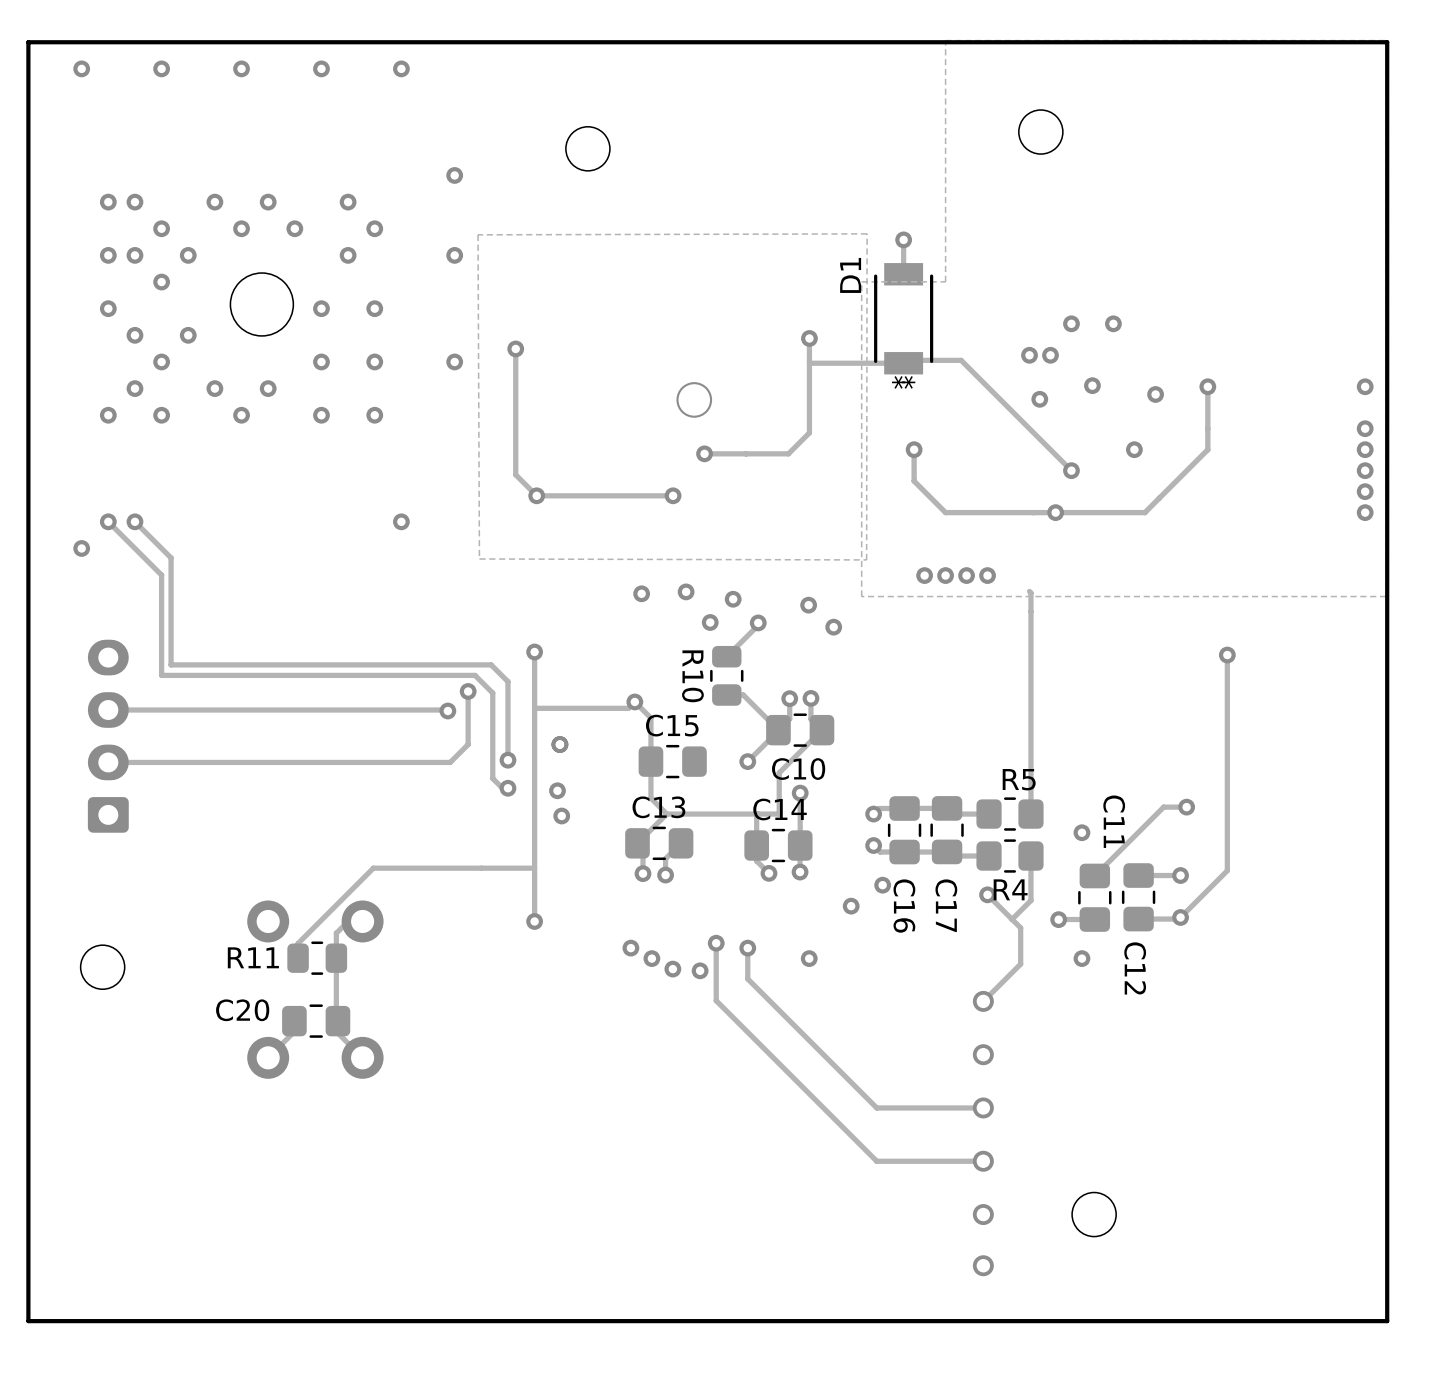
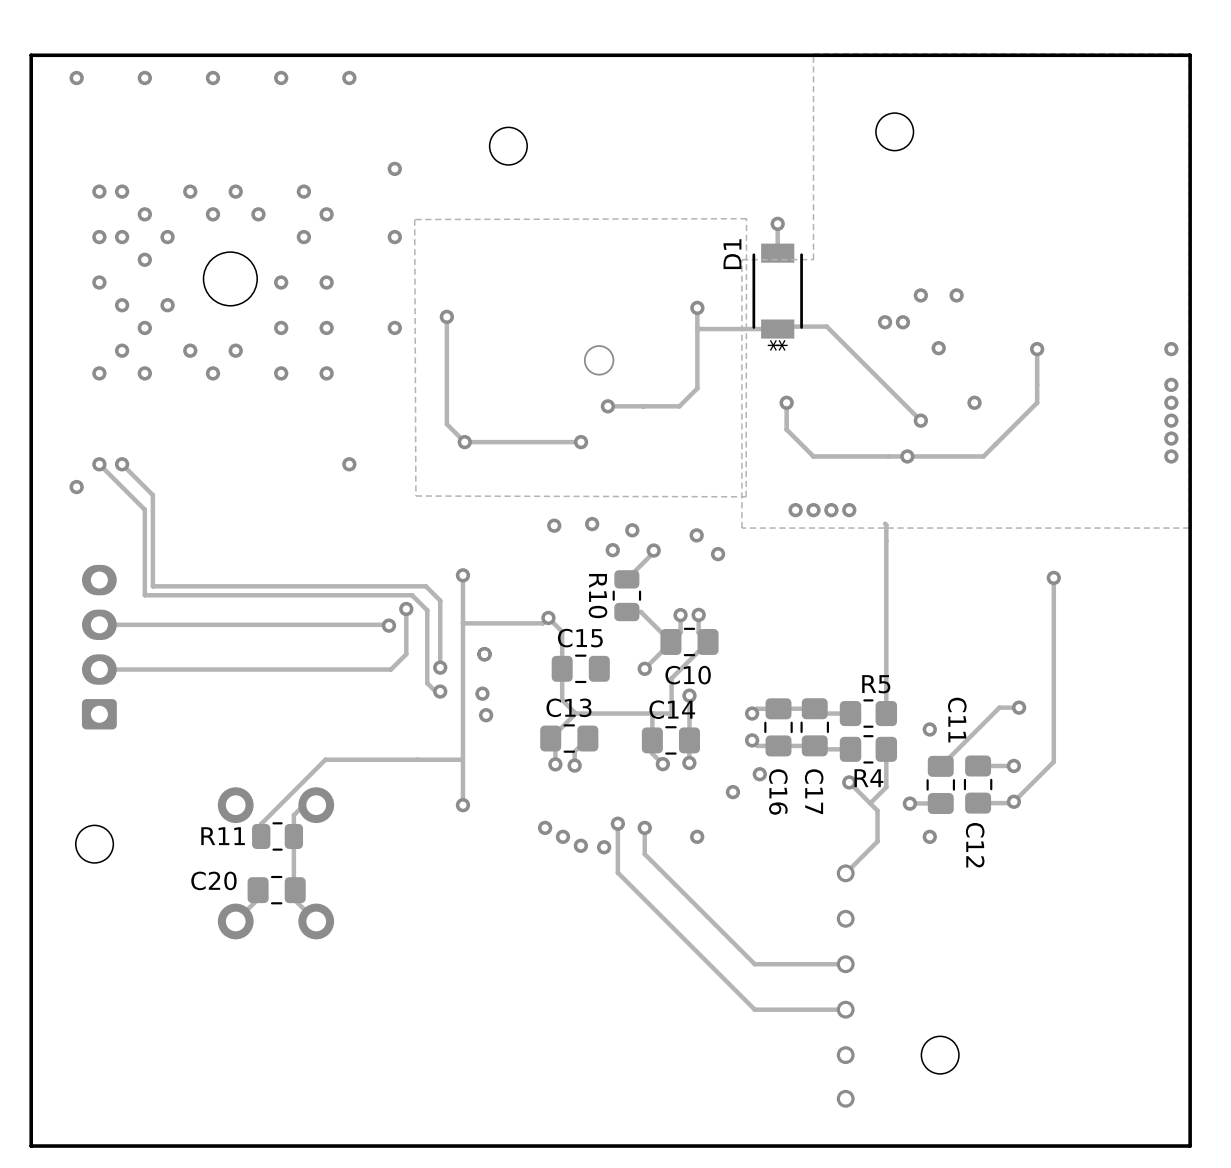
via: (1155, 394) -> none
via: (1039, 399) -> none

